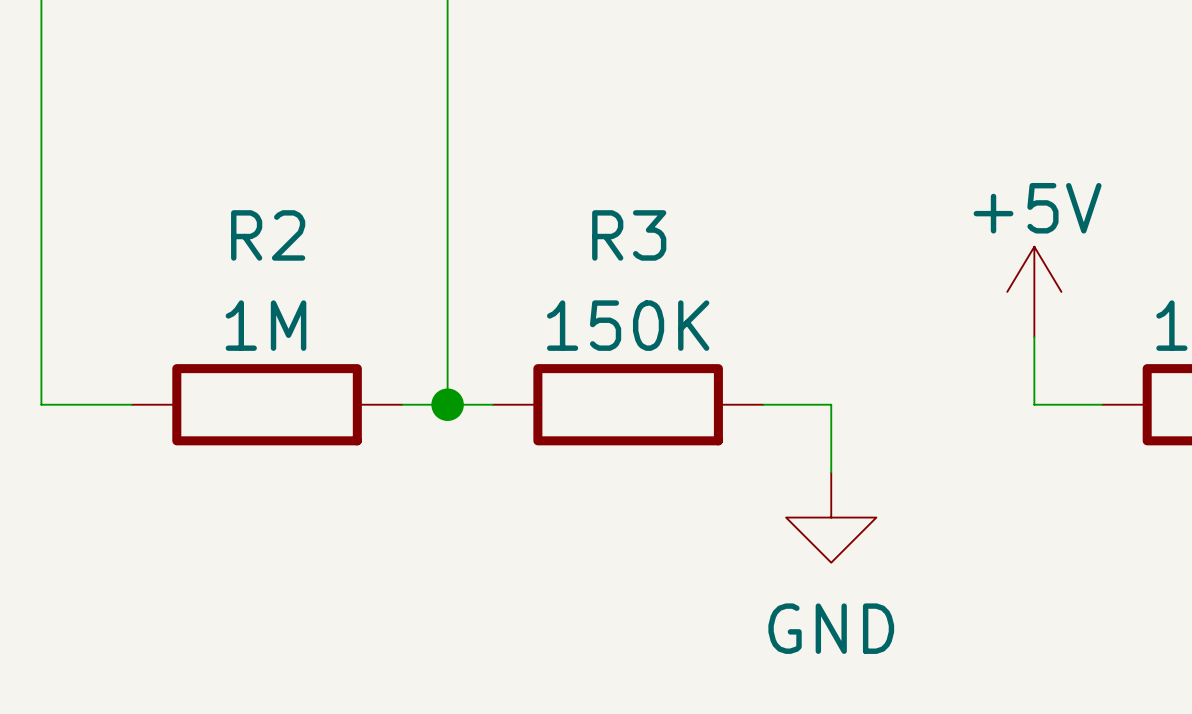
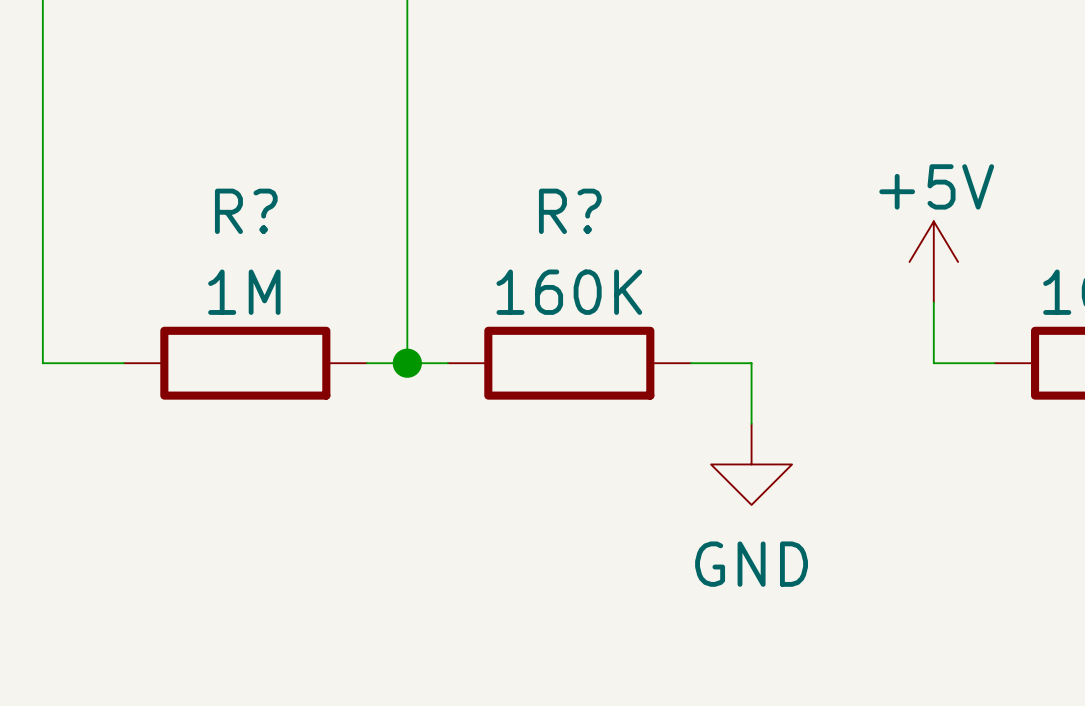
R2 name: R2 (268, 235) -> R? (246, 211)
R3 name: R3 (629, 235) -> R? (570, 211)
R3 value: 150K (628, 325) -> 160K (569, 292)

